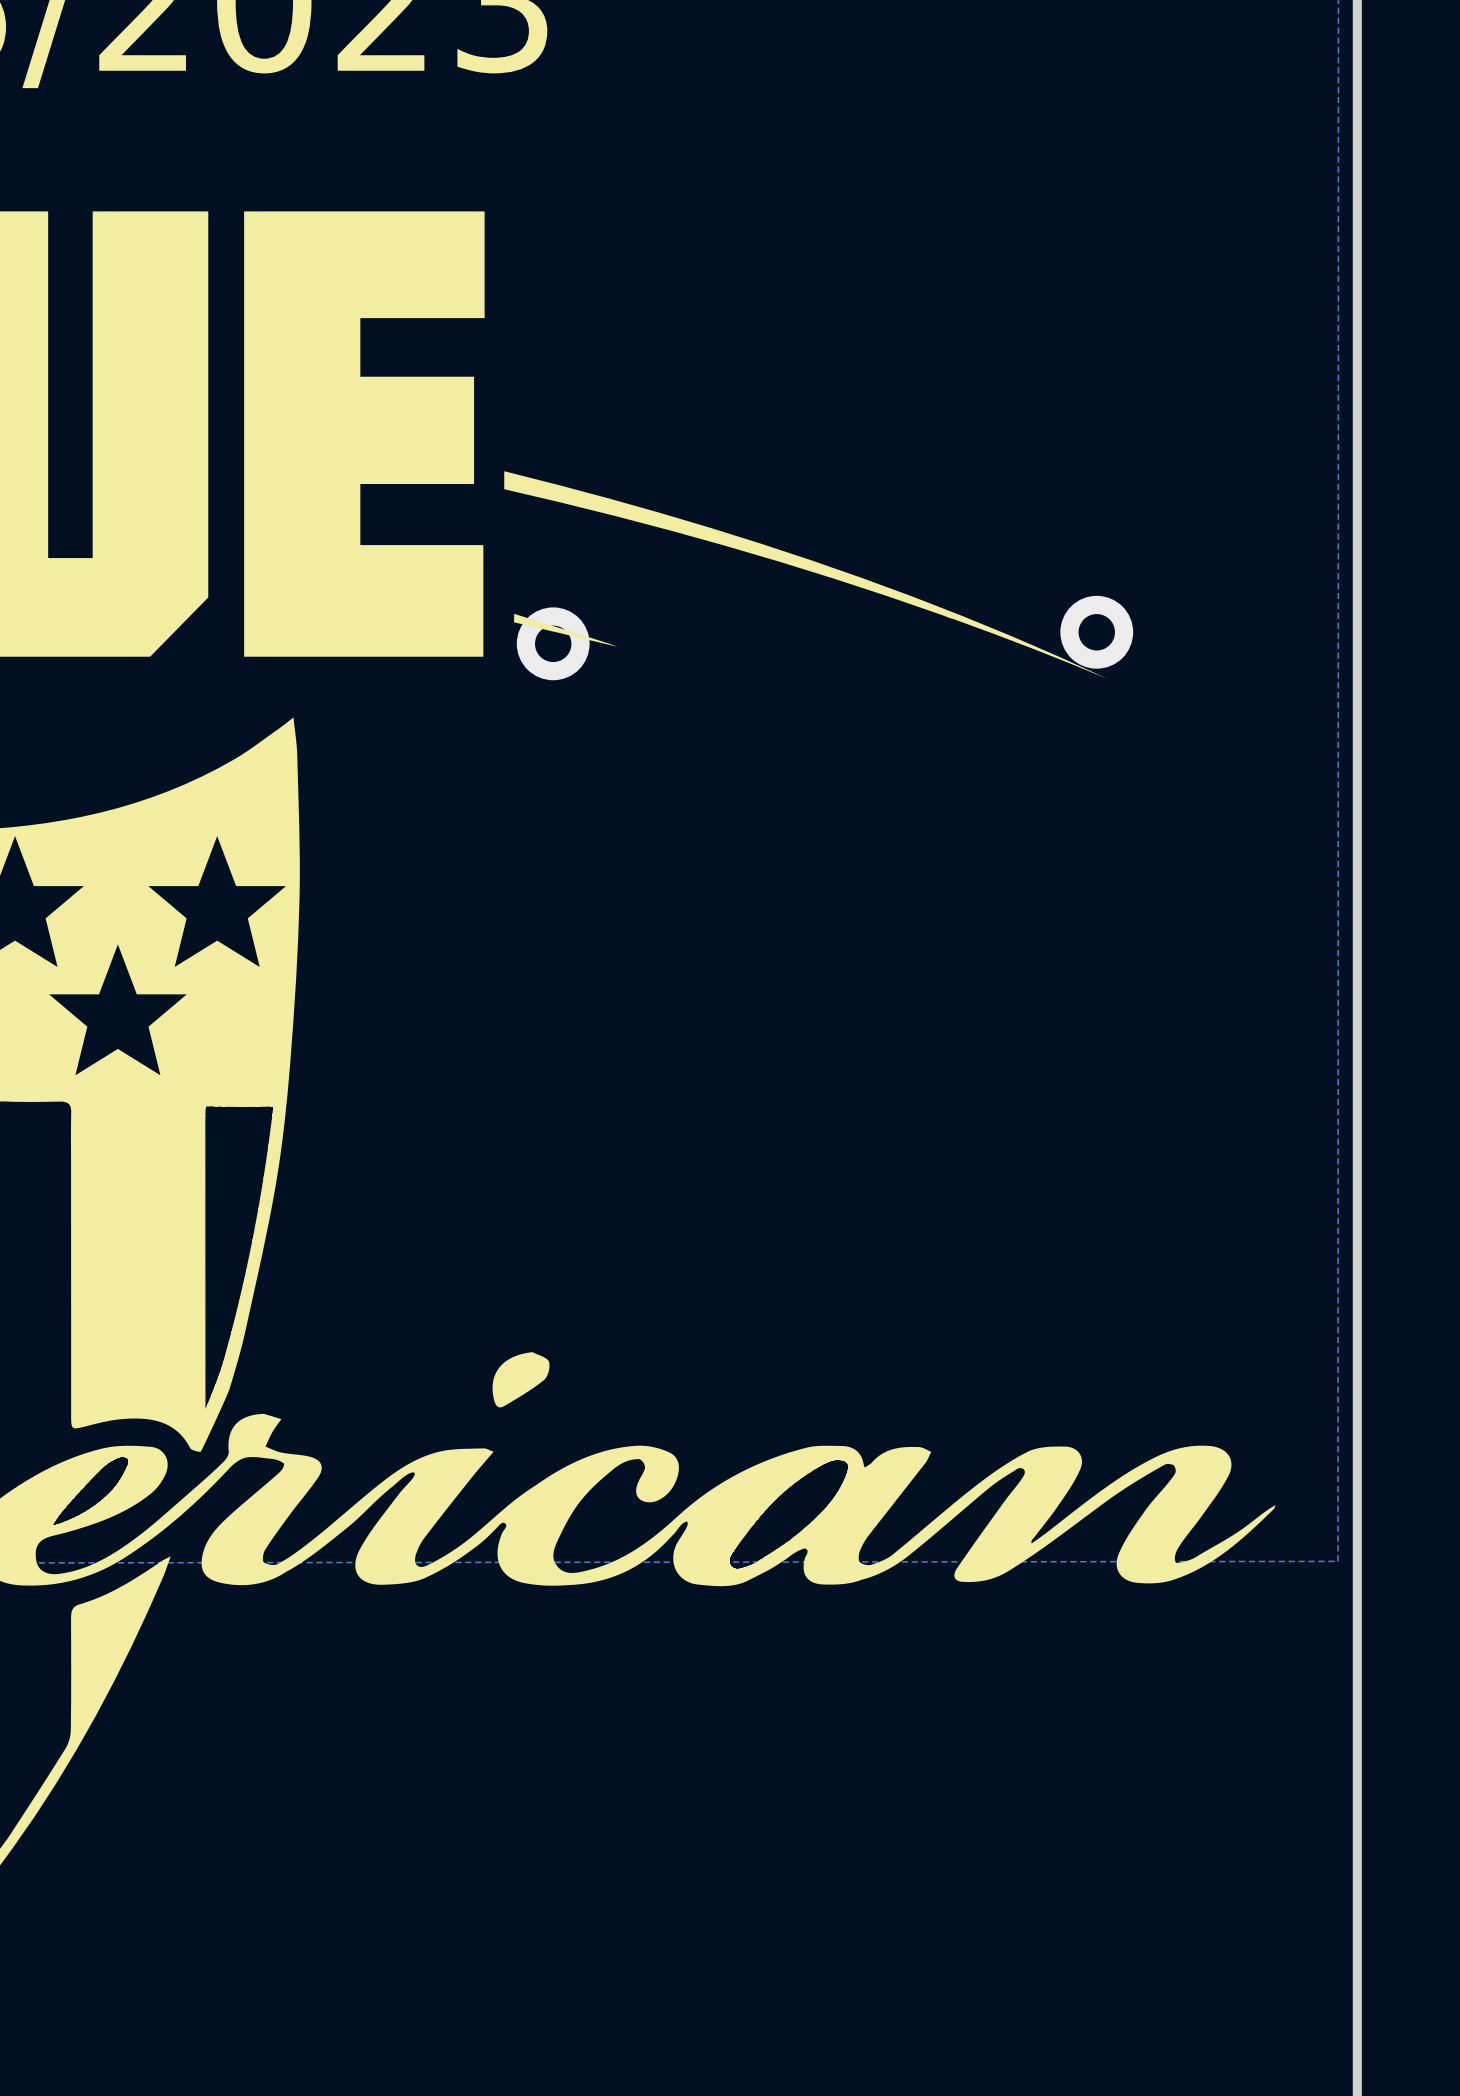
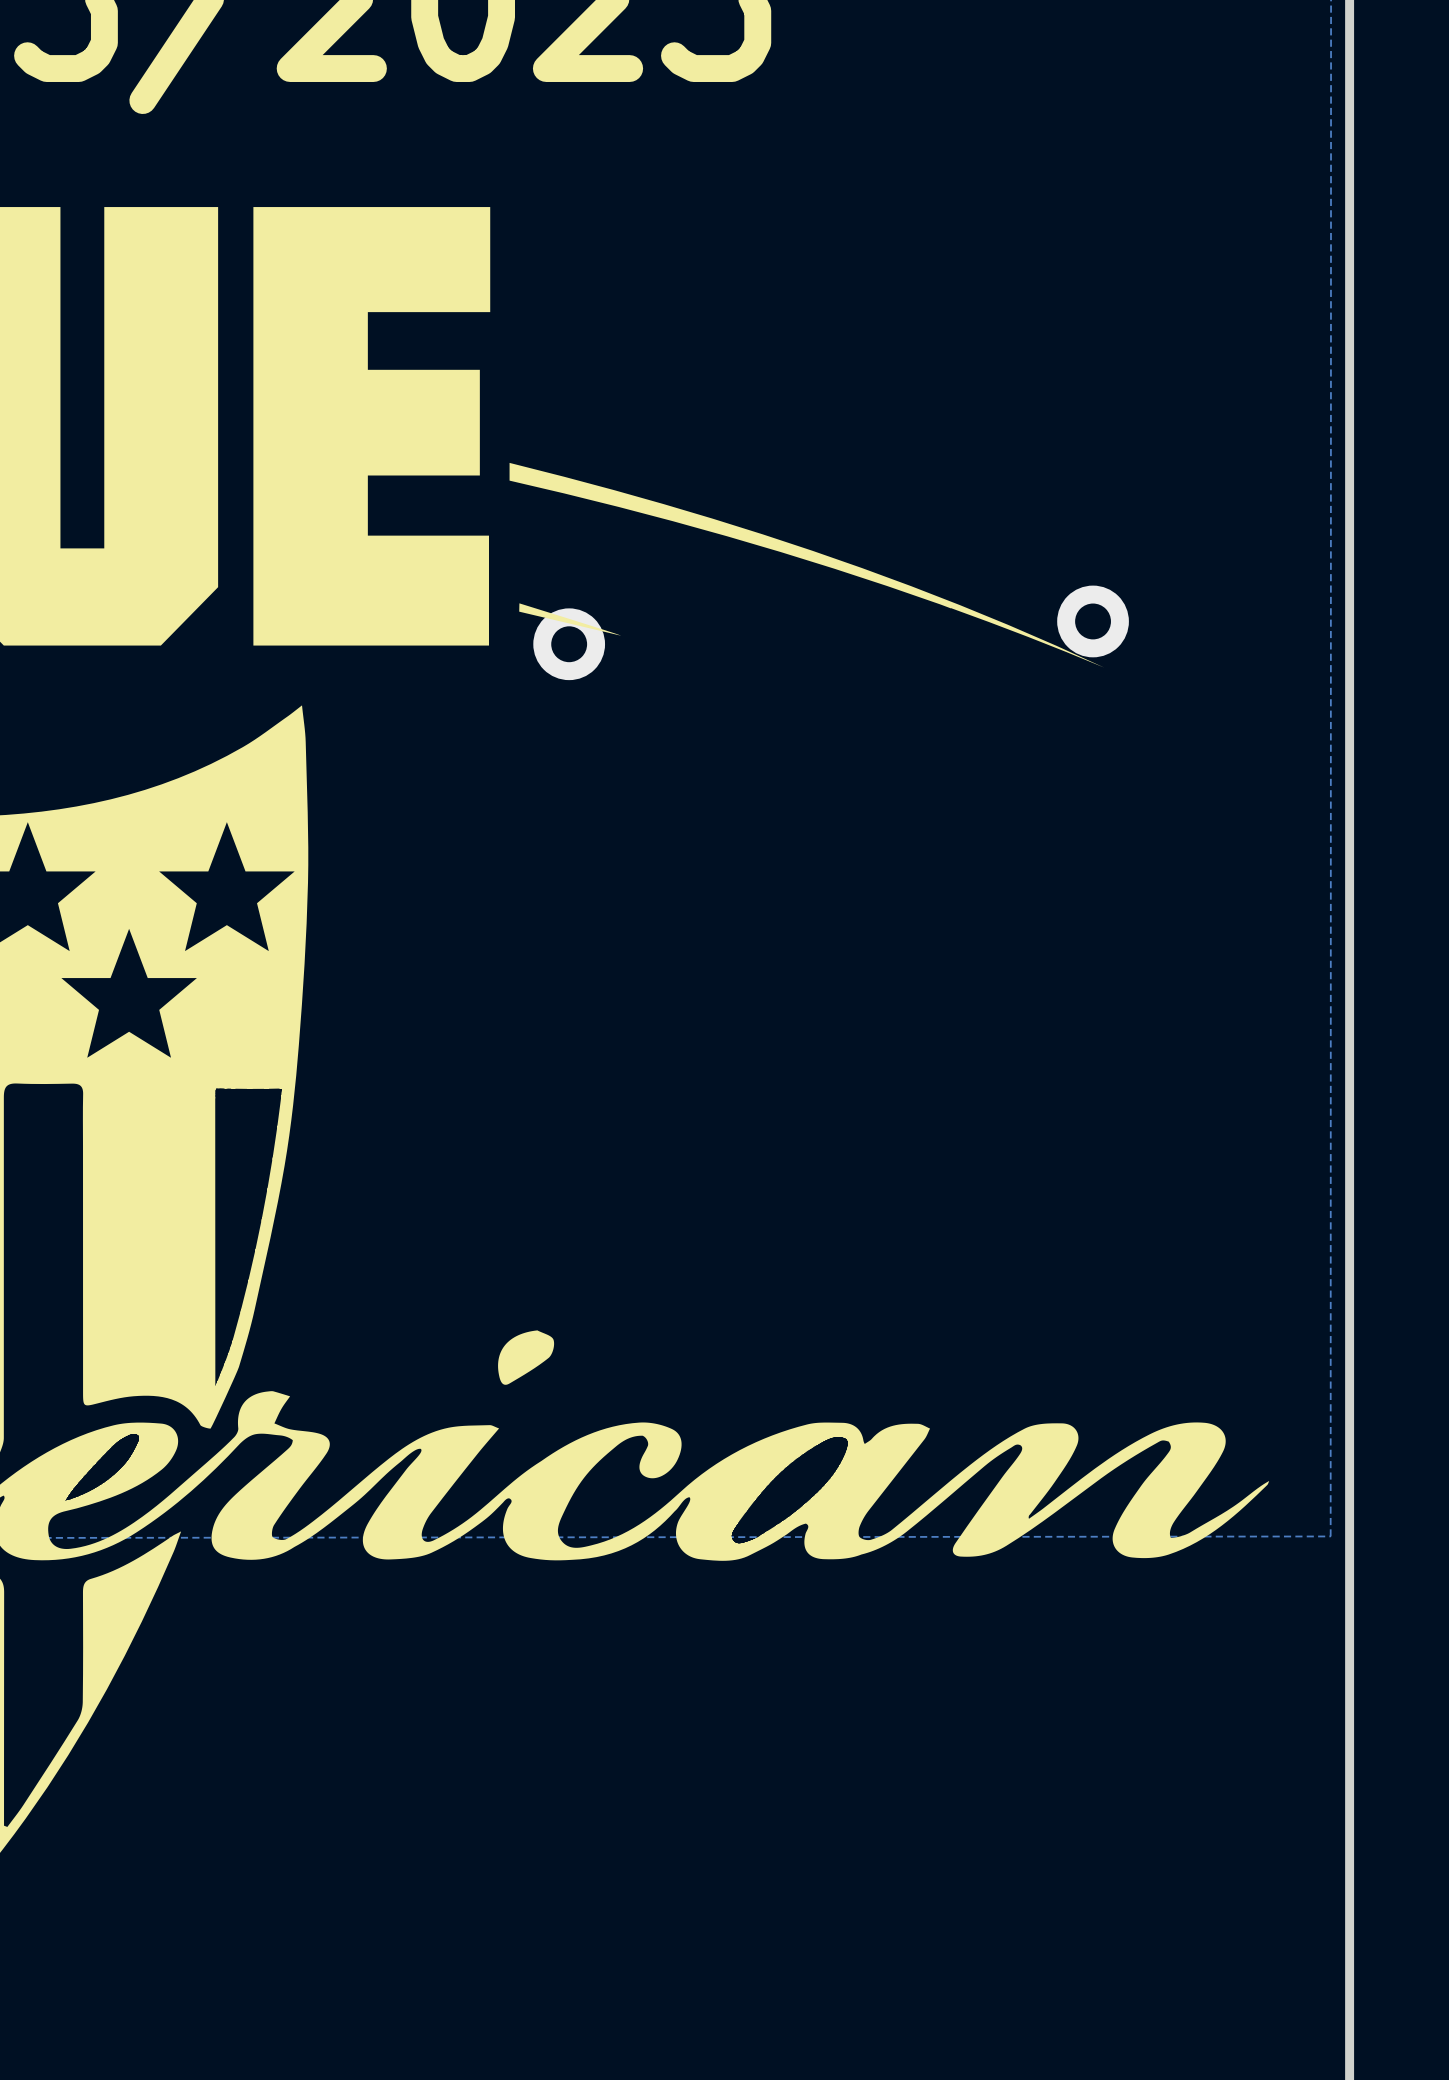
via position: (553, 643) -> (569, 644)

